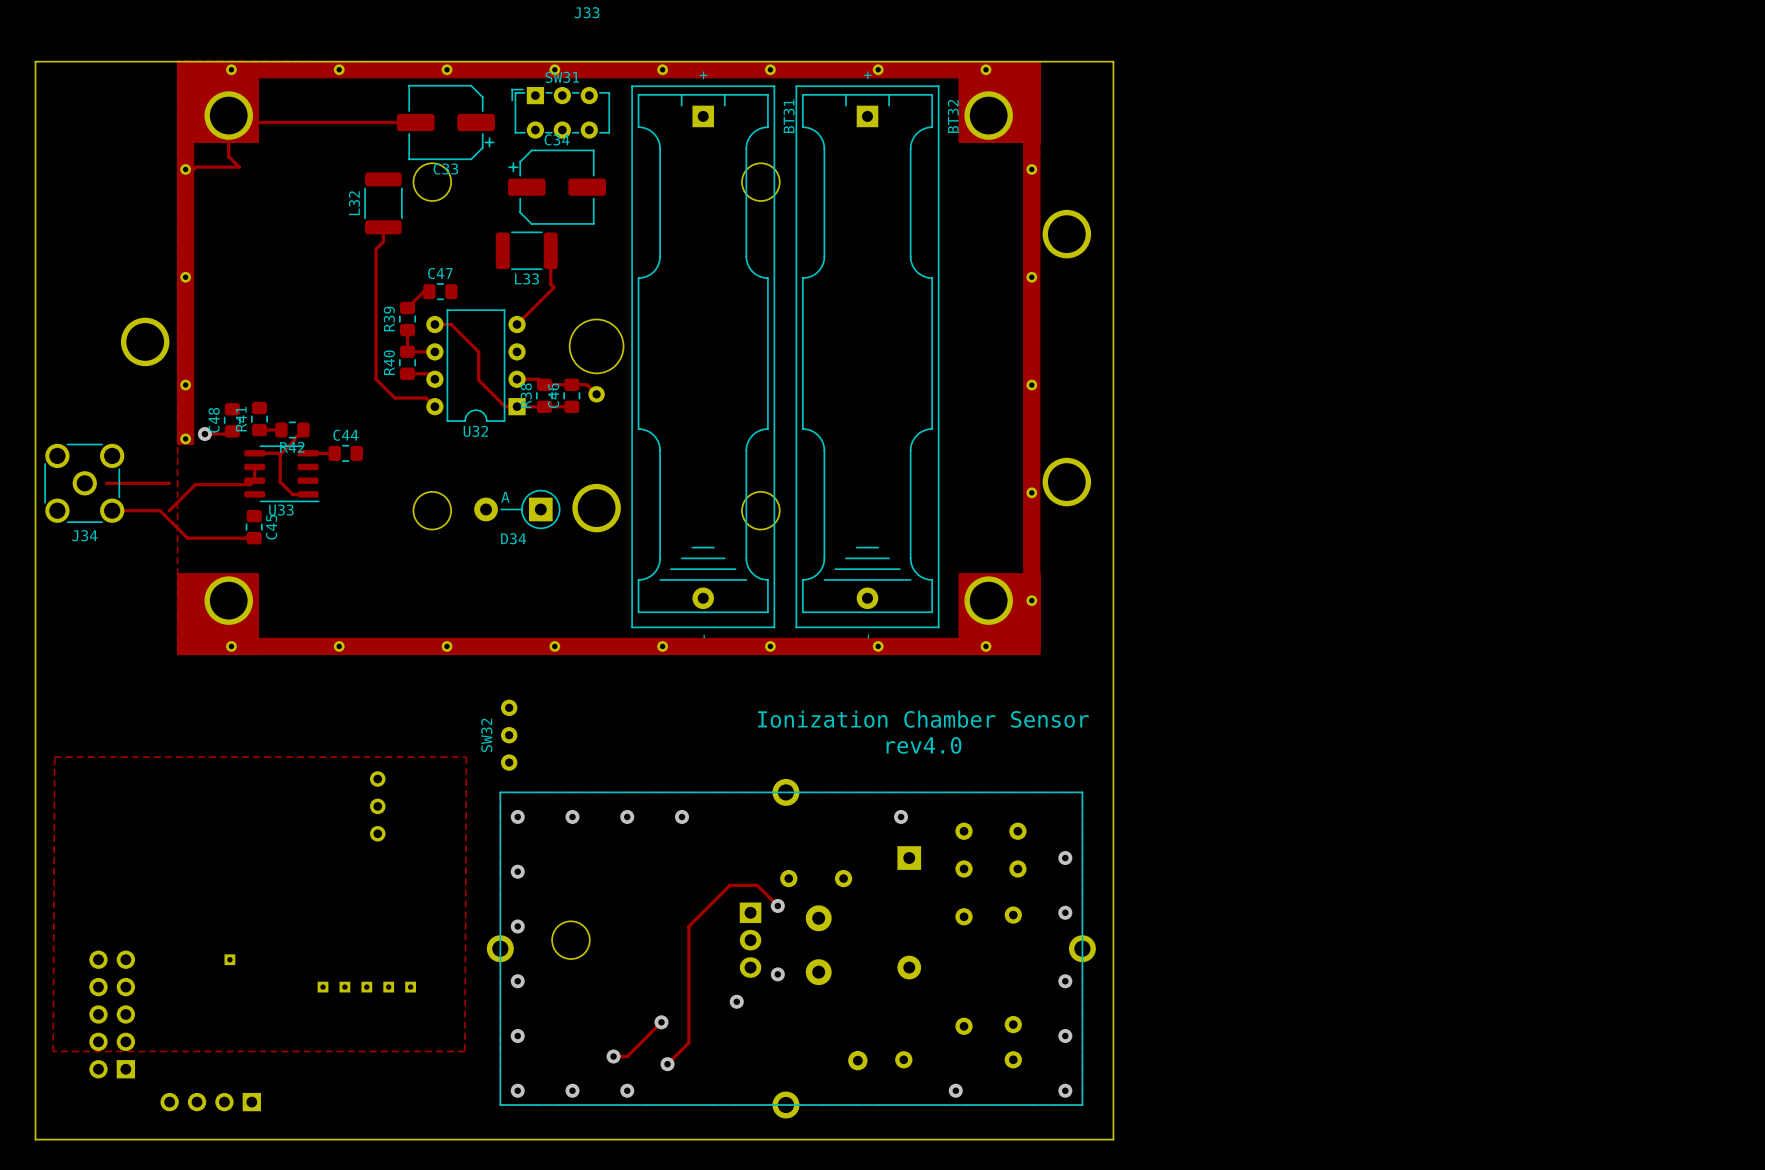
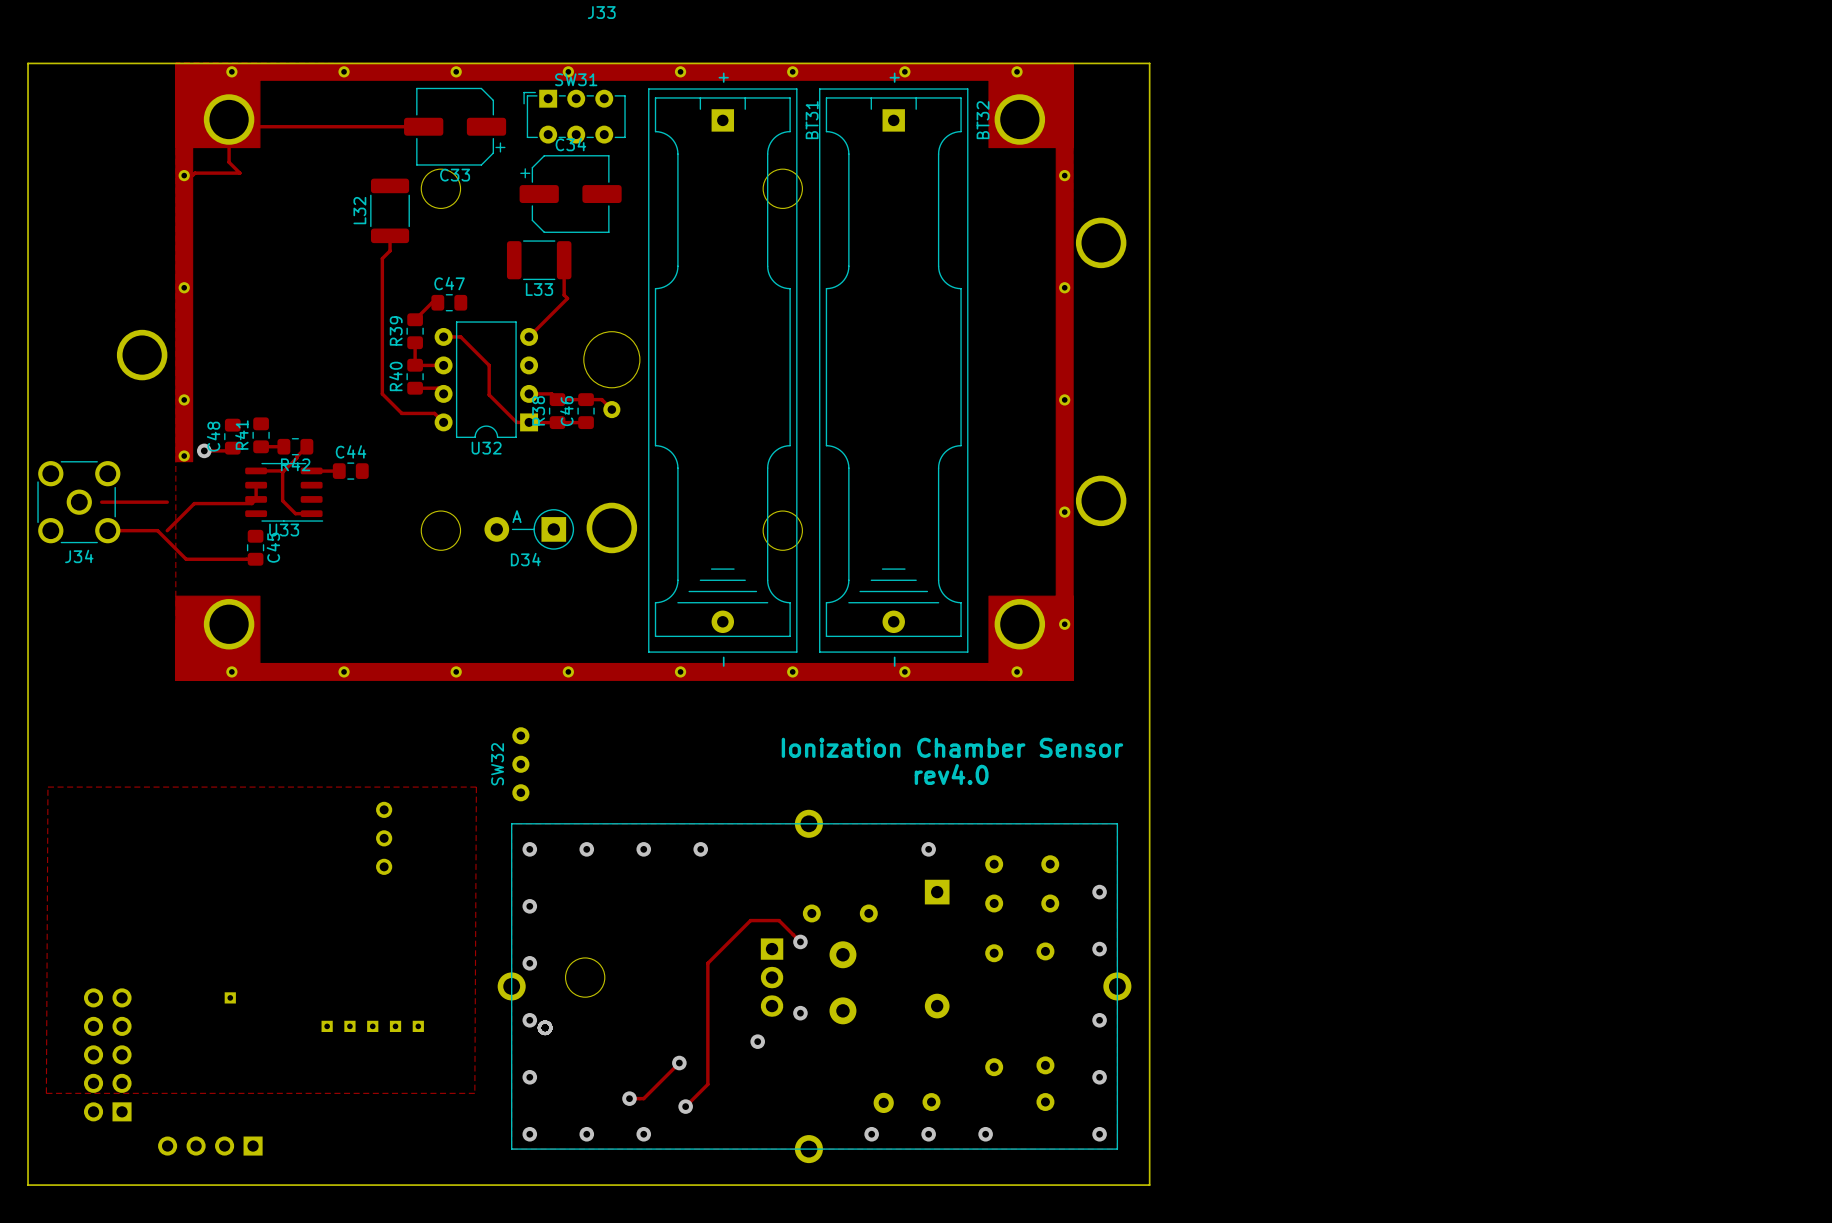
via: none -> (545, 1027)
via: none -> (871, 1134)
via: none -> (928, 1134)

